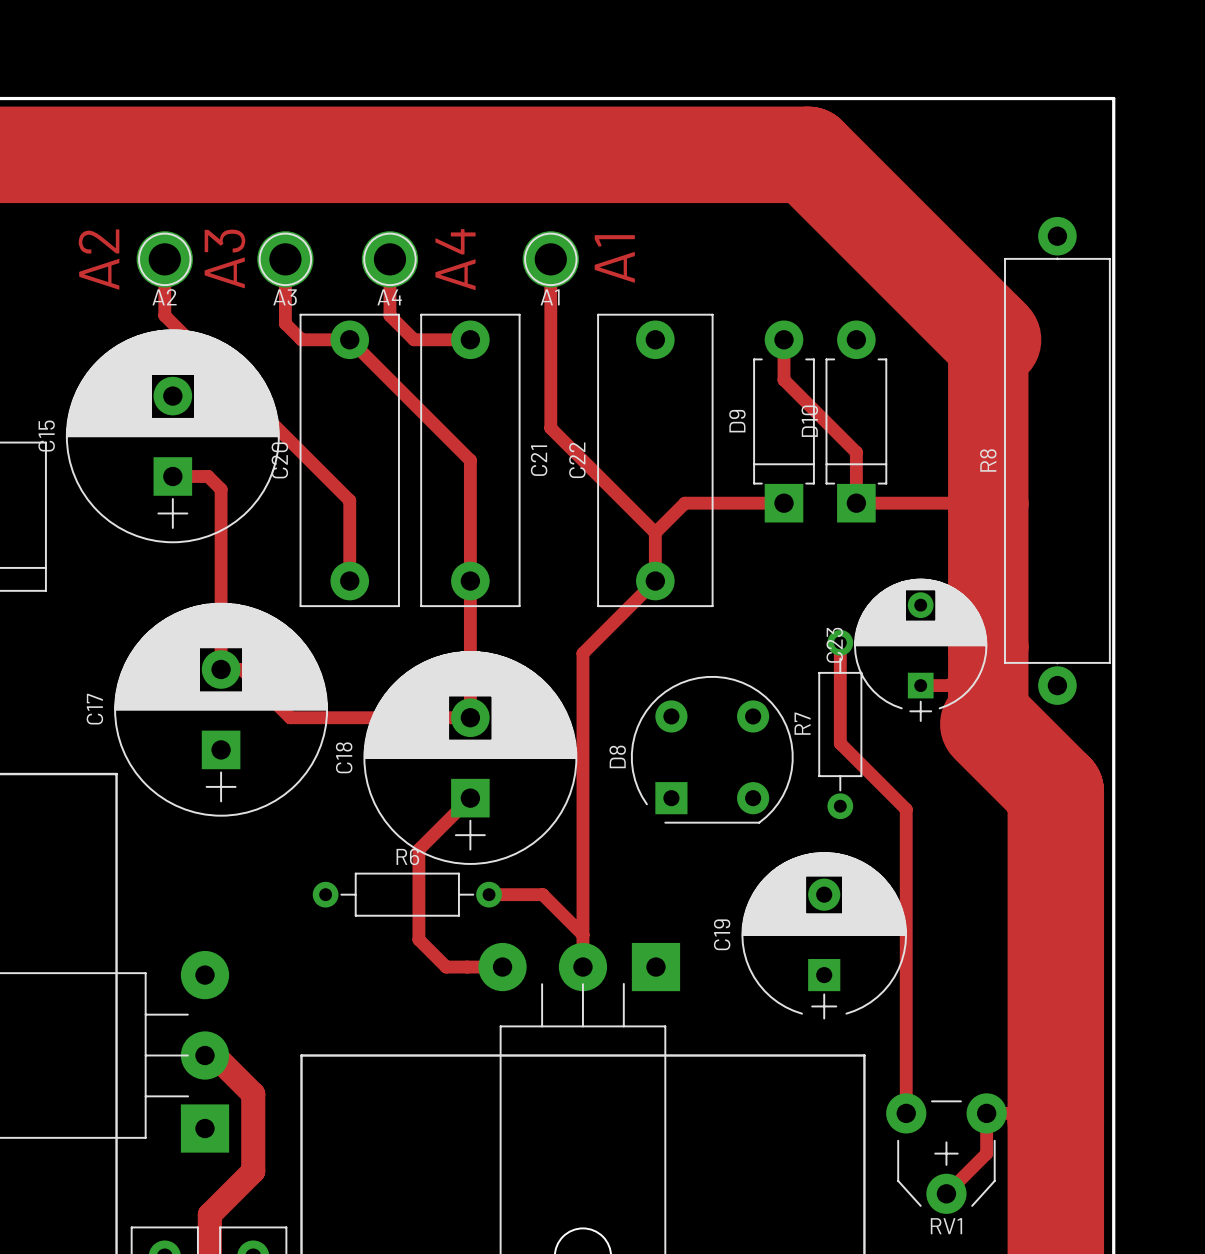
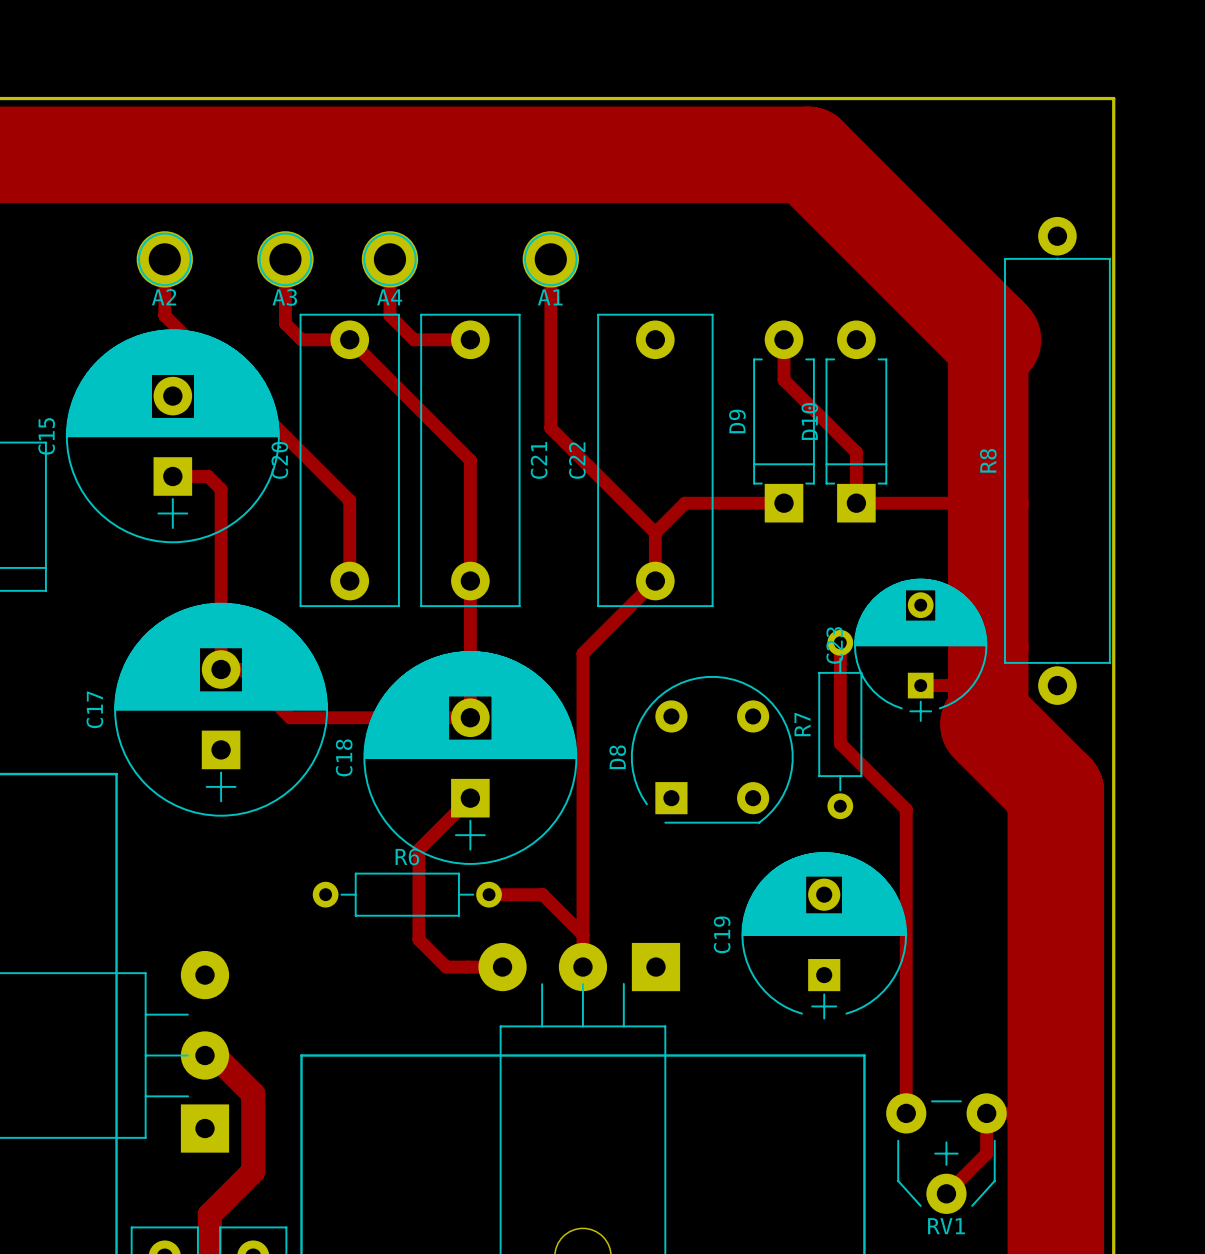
text: A2 (99, 259) -> none
text: A3 (224, 259) -> none
text: A4 (455, 259) -> none
text: A1 (614, 259) -> none

